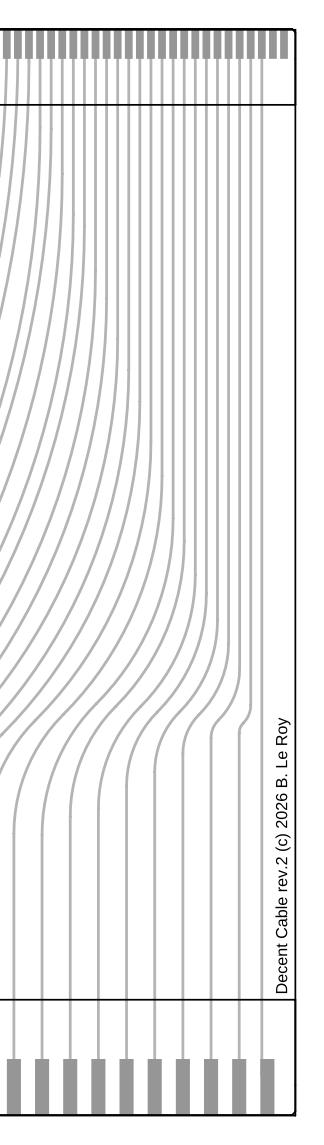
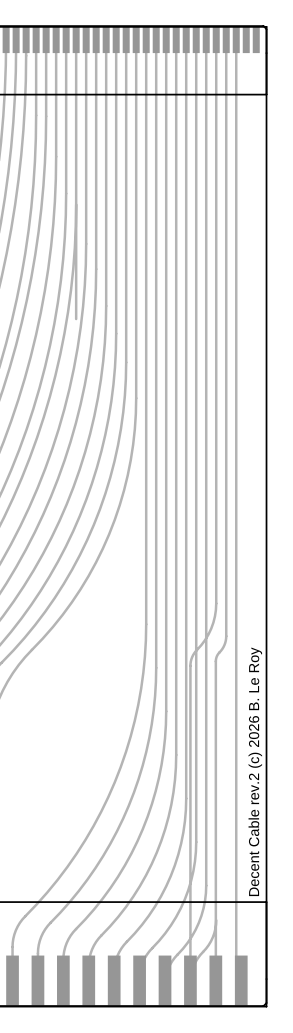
track: none -> (76, 204) (76, 319)
track: (162, 475) (159, 520) (154, 549) (146, 577) (130, 618) (100, 669) (42, 740) (31, 759) (19, 790) (13, 833) (13, 1049) -> (146, 429) (145, 640) (141, 688) (134, 720) (120, 767) (93, 826) (57, 879) (19, 922) (14, 934) (12, 947)
track: (173, 518) (170, 556) (165, 582) (147, 630) (121, 674) (82, 719) (70, 736) (56, 763) (46, 793) (42, 834) (42, 1056) -> (156, 467) (155, 682) (153, 710) (146, 751) (128, 805) (110, 843) (78, 890) (45, 929) (39, 940) (37, 953)
track: (184, 541) (178, 593) (161, 642) (141, 676) (102, 721) (91, 738) (82, 756) (73, 786) (70, 816) (70, 1063) -> (166, 488) (165, 724) (158, 778) (147, 816) (131, 853) (102, 898) (70, 935) (65, 947) (63, 959)
track: (195, 574) (190, 616) (176, 655) (160, 682) (128, 720) (117, 736) (109, 753) (101, 780) (98, 808) (98, 1070) -> (176, 518) (176, 754) (171, 804) (161, 840) (146, 875) (126, 906) (96, 941) (90, 953) (88, 966)
track: (206, 593) (203, 626) (193, 657) (178, 686) (142, 731) (134, 746) (127, 769) (126, 1077) -> (186, 535) (186, 798) (183, 832) (174, 865) (166, 886) (148, 915) (121, 948) (116, 959) (114, 972)
track: (217, 620) (214, 645) (207, 669) (195, 692) (167, 727) (158, 745) (155, 758) (154, 1084) -> (196, 559) (194, 861) (188, 890) (180, 908) (165, 933) (144, 958) (139, 978)
track: (228, 643) (227, 659) (220, 681) (209, 702) (189, 727) (183, 748) (182, 1086) -> (206, 580) (205, 893) (198, 922) (187, 942) (170, 964) (165, 985)
track: none -> (216, 920) (212, 937) (195, 962) (190, 982)

